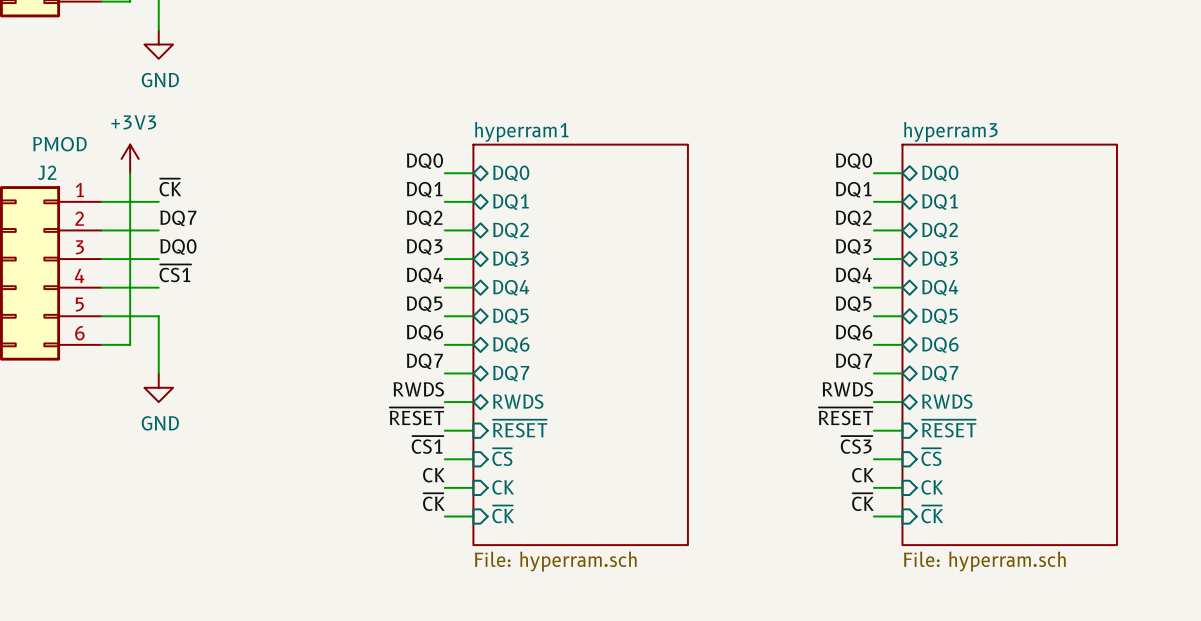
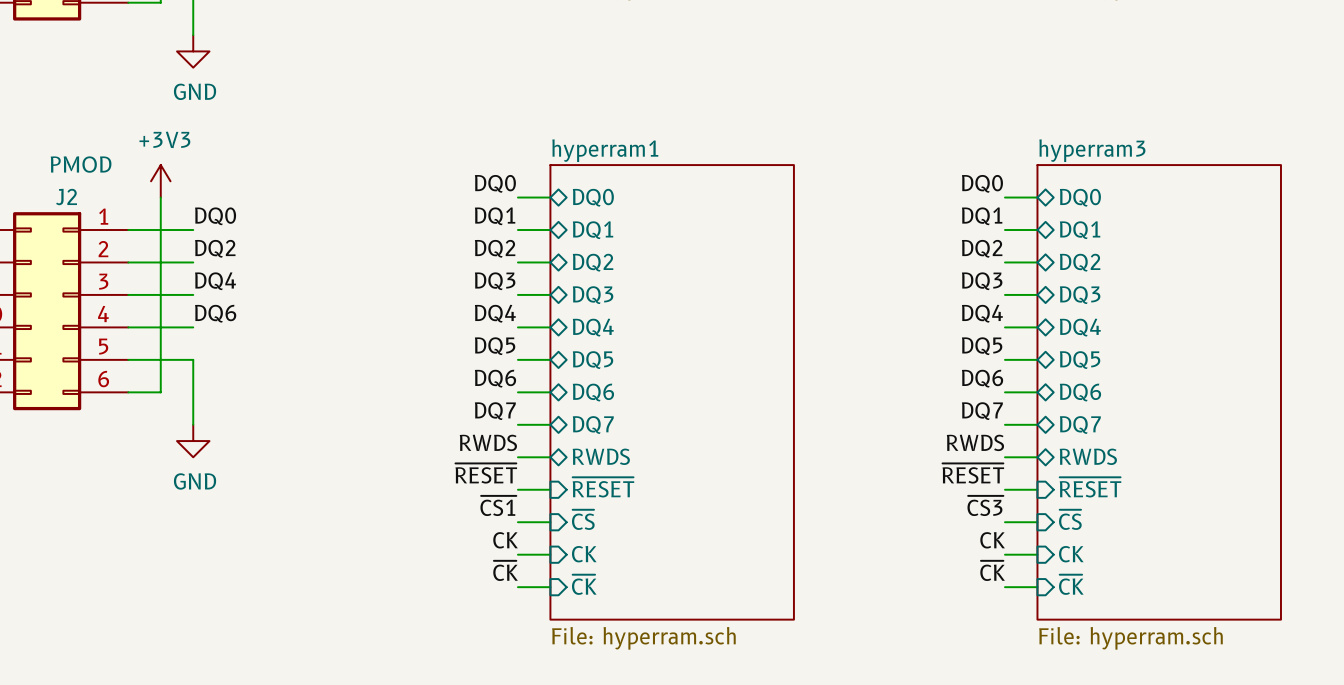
label: ~{CK} (170, 187) -> DQ0 (215, 216)
label: DQ7 (178, 218) -> DQ2 (215, 248)
label: DQ0 (178, 246) -> DQ4 (215, 281)
label: ~{CS1} (175, 273) -> DQ6 (215, 313)

